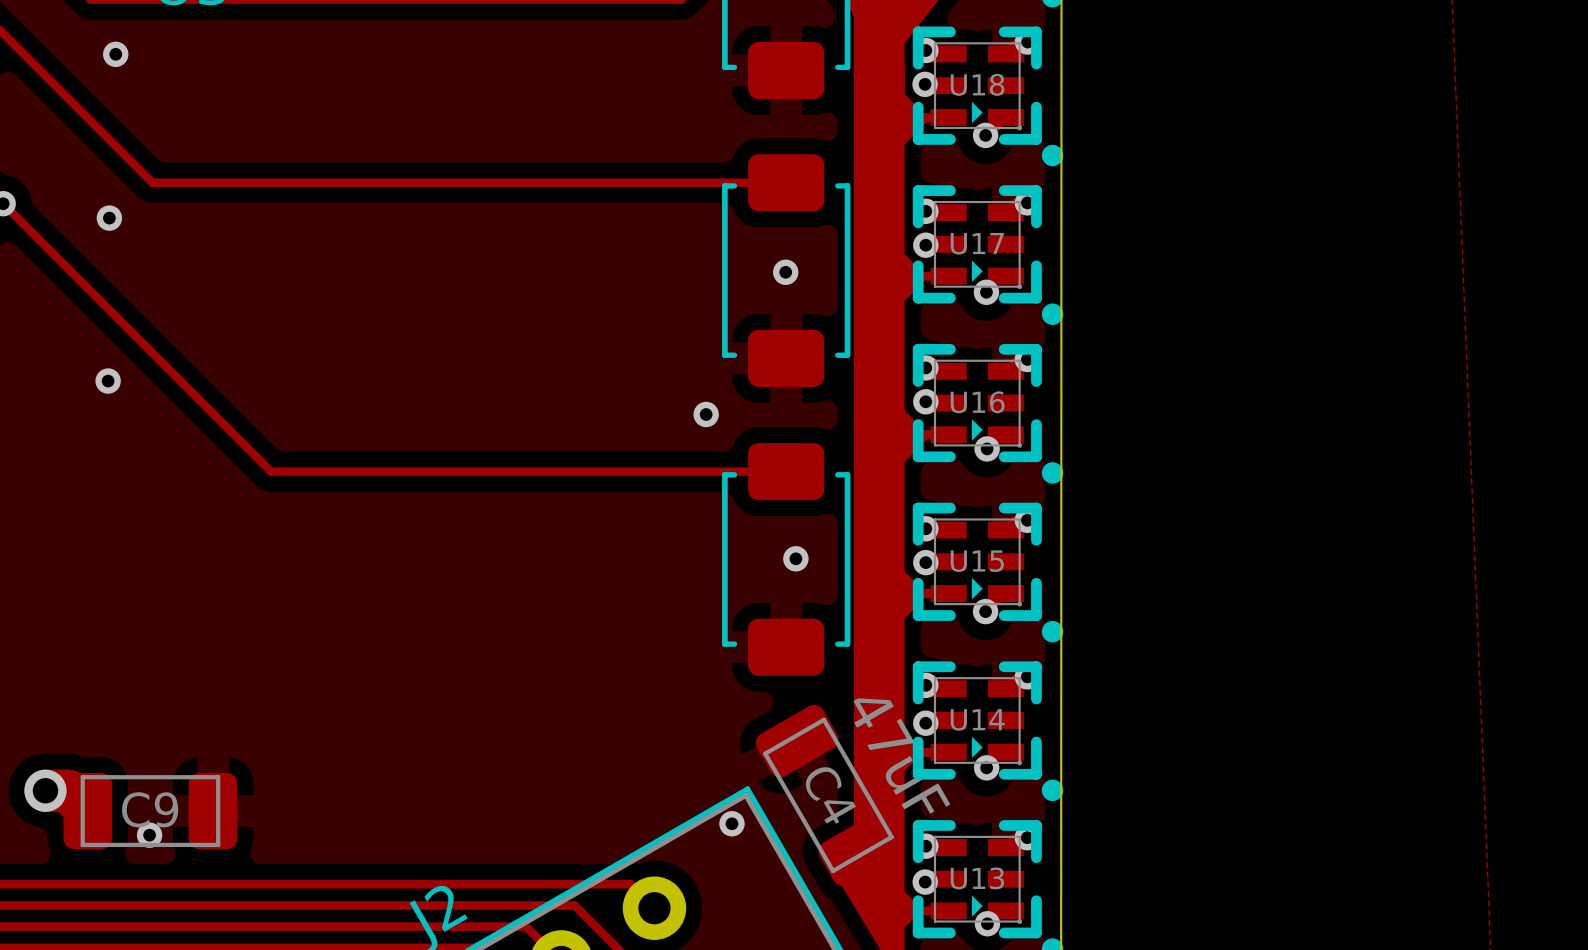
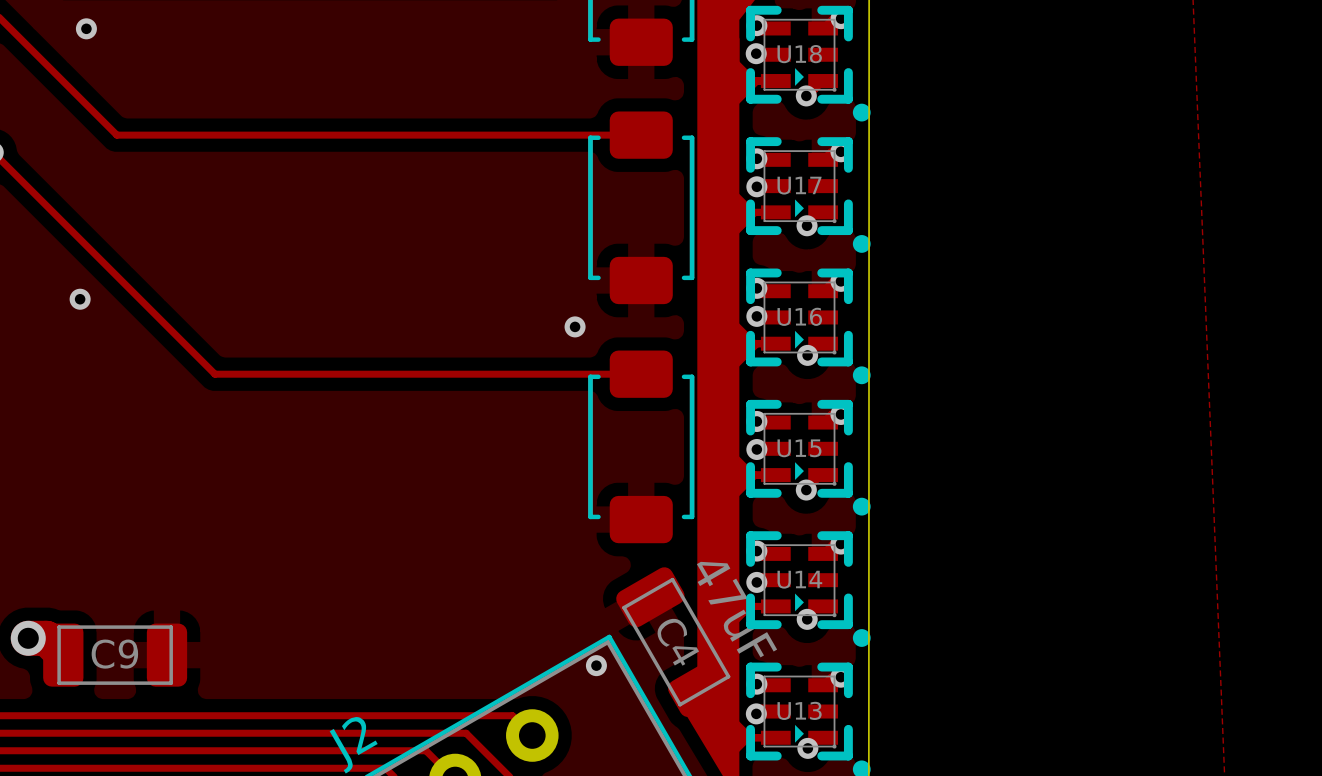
via: (109, 218) -> none
via: (785, 272) -> none
via: (795, 558) -> none
via: (149, 835) -> none

